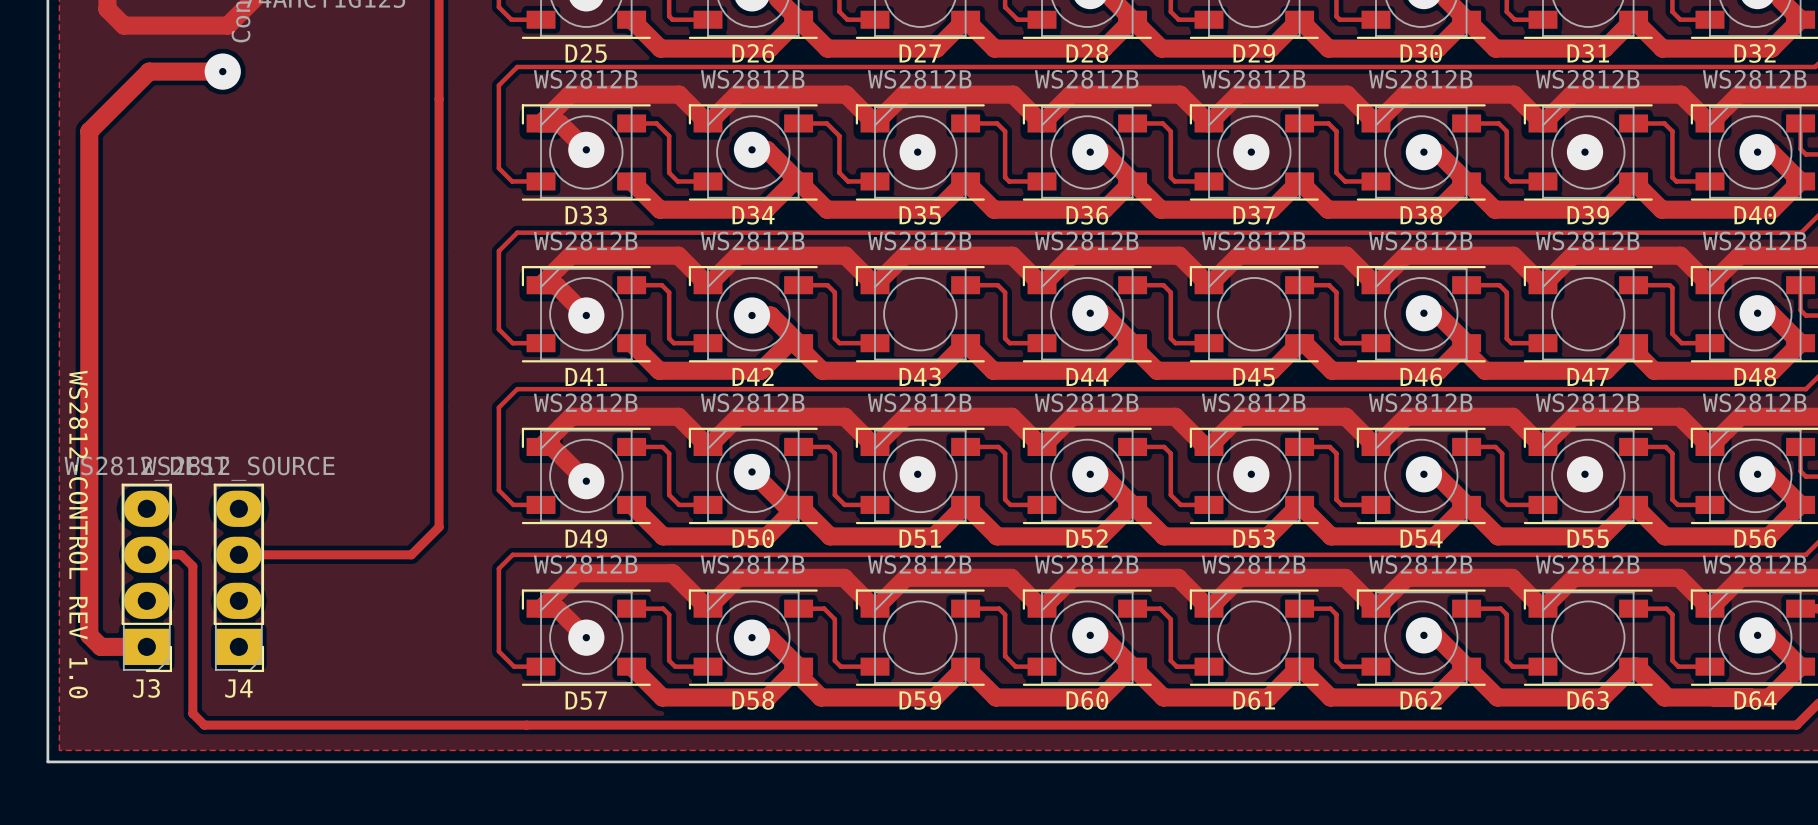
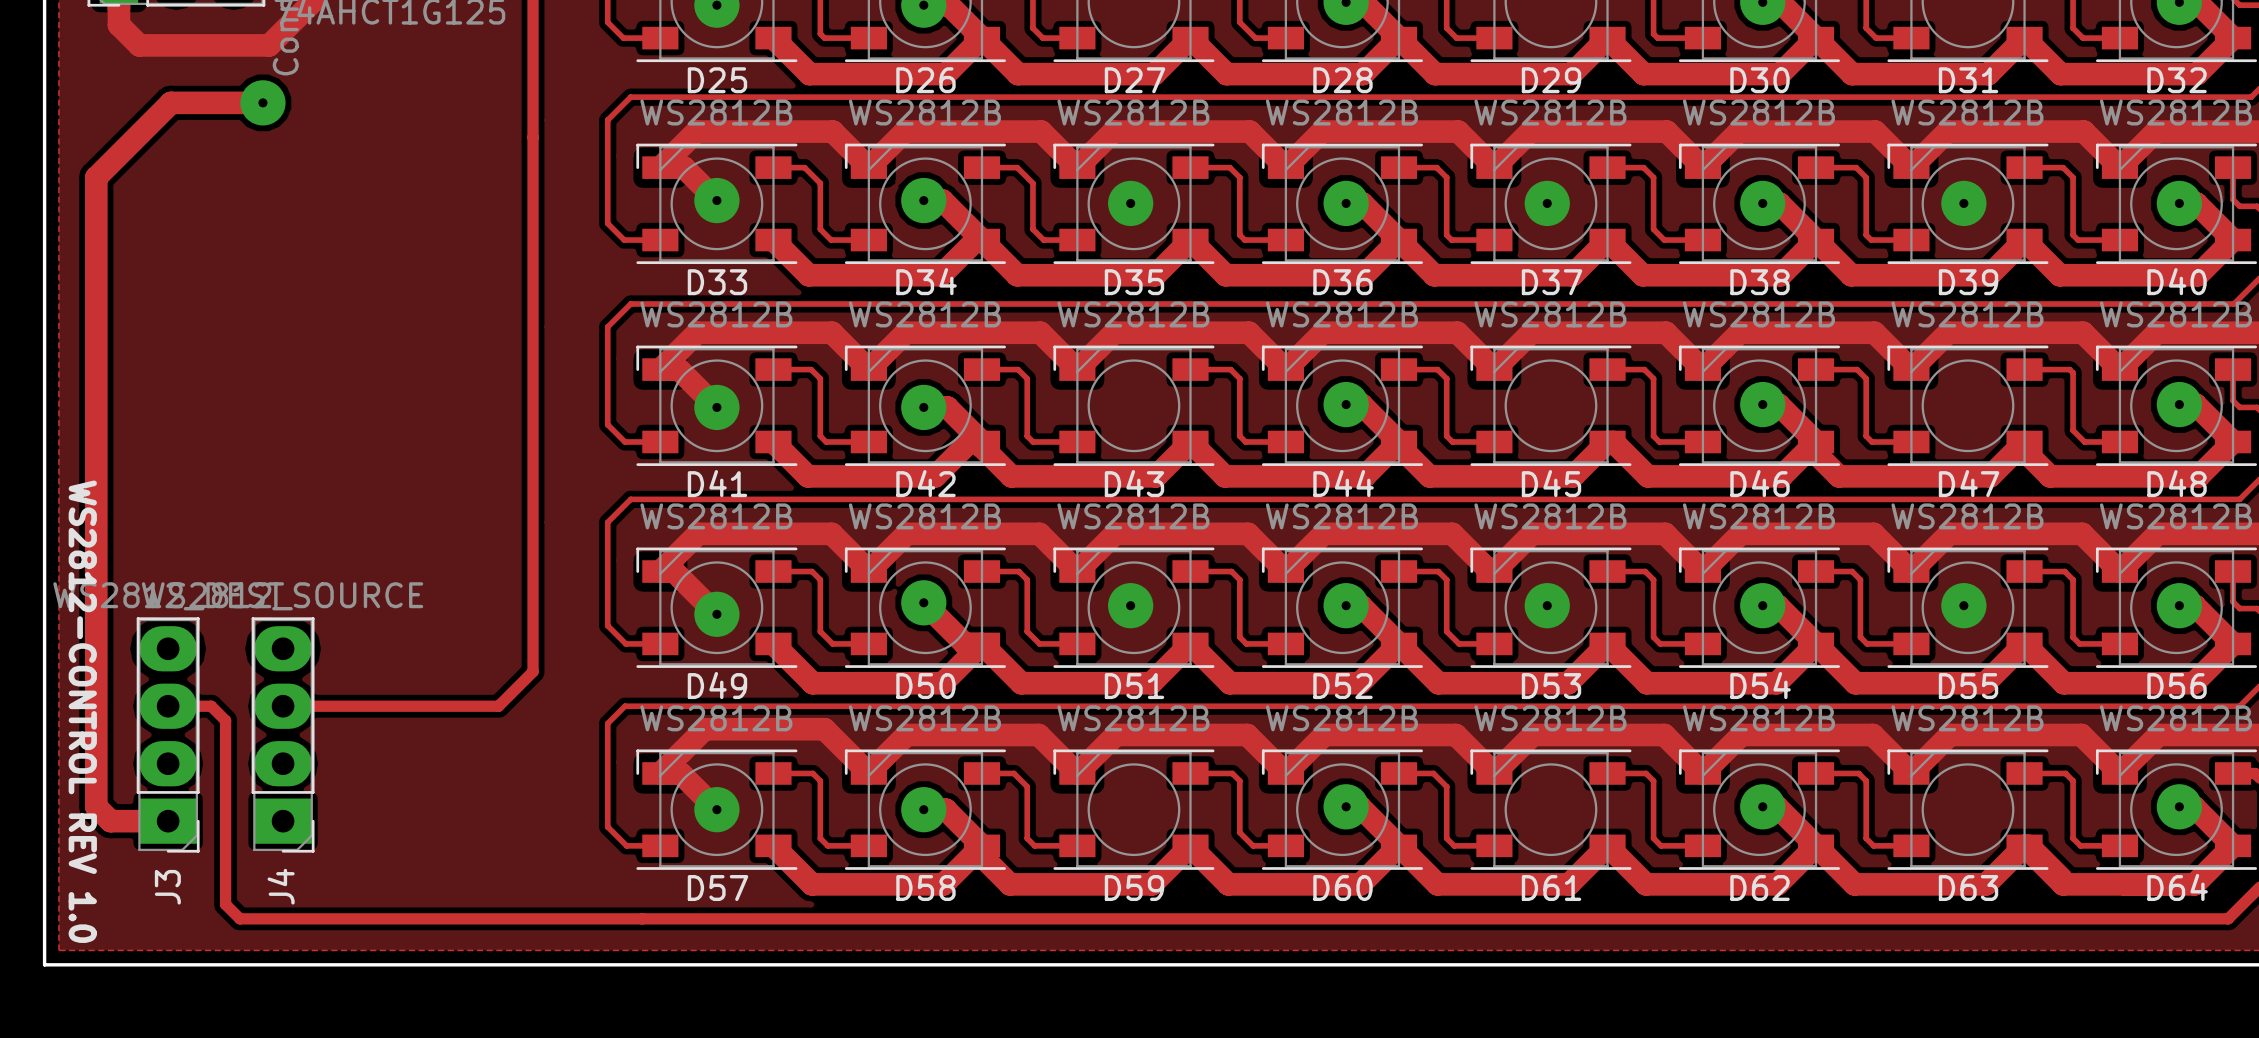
J3 name rotation: 0° (146, 688) -> 90° counterclockwise (167, 887)
J4 name rotation: 0° (238, 688) -> 90° counterclockwise (281, 886)

